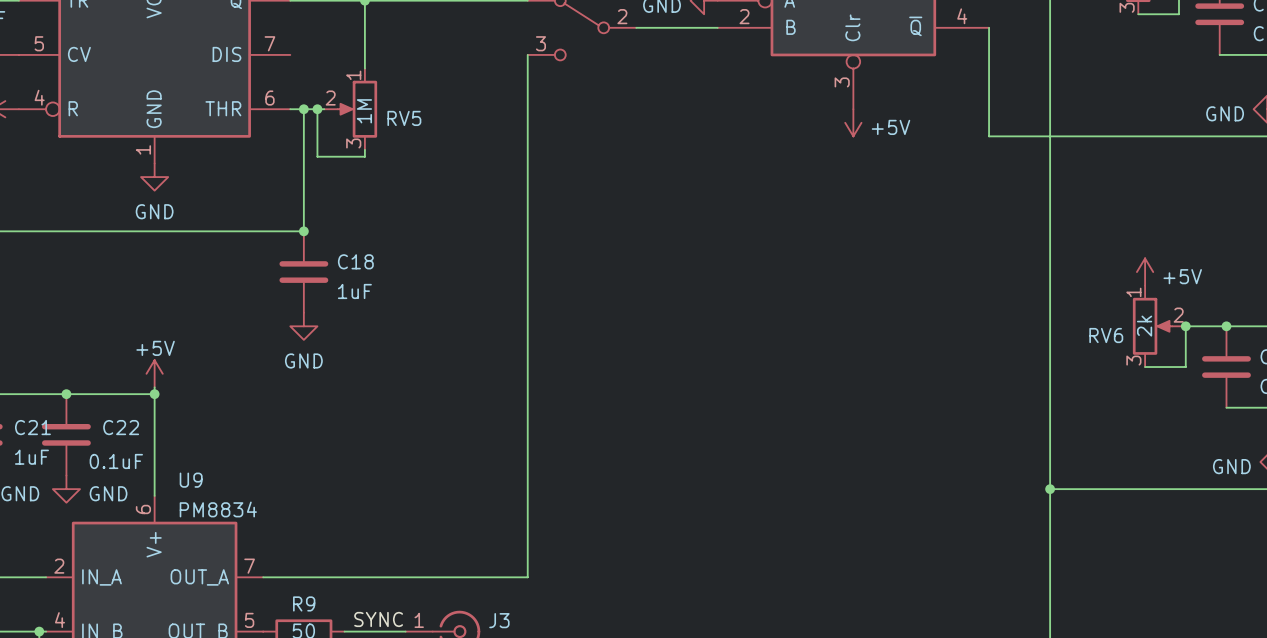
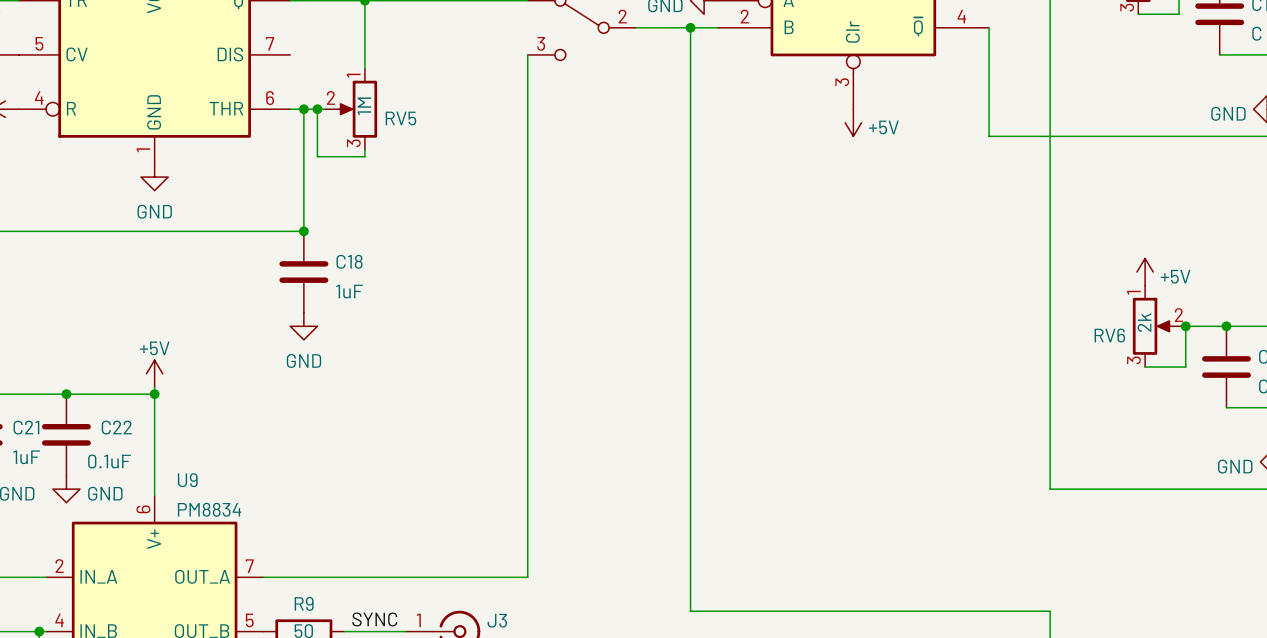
junction: none -> (690, 27)
wire: (1050, 489) (1050, 611) -> (690, 27) (690, 611) (1050, 611)
junction: (1050, 489) -> none

